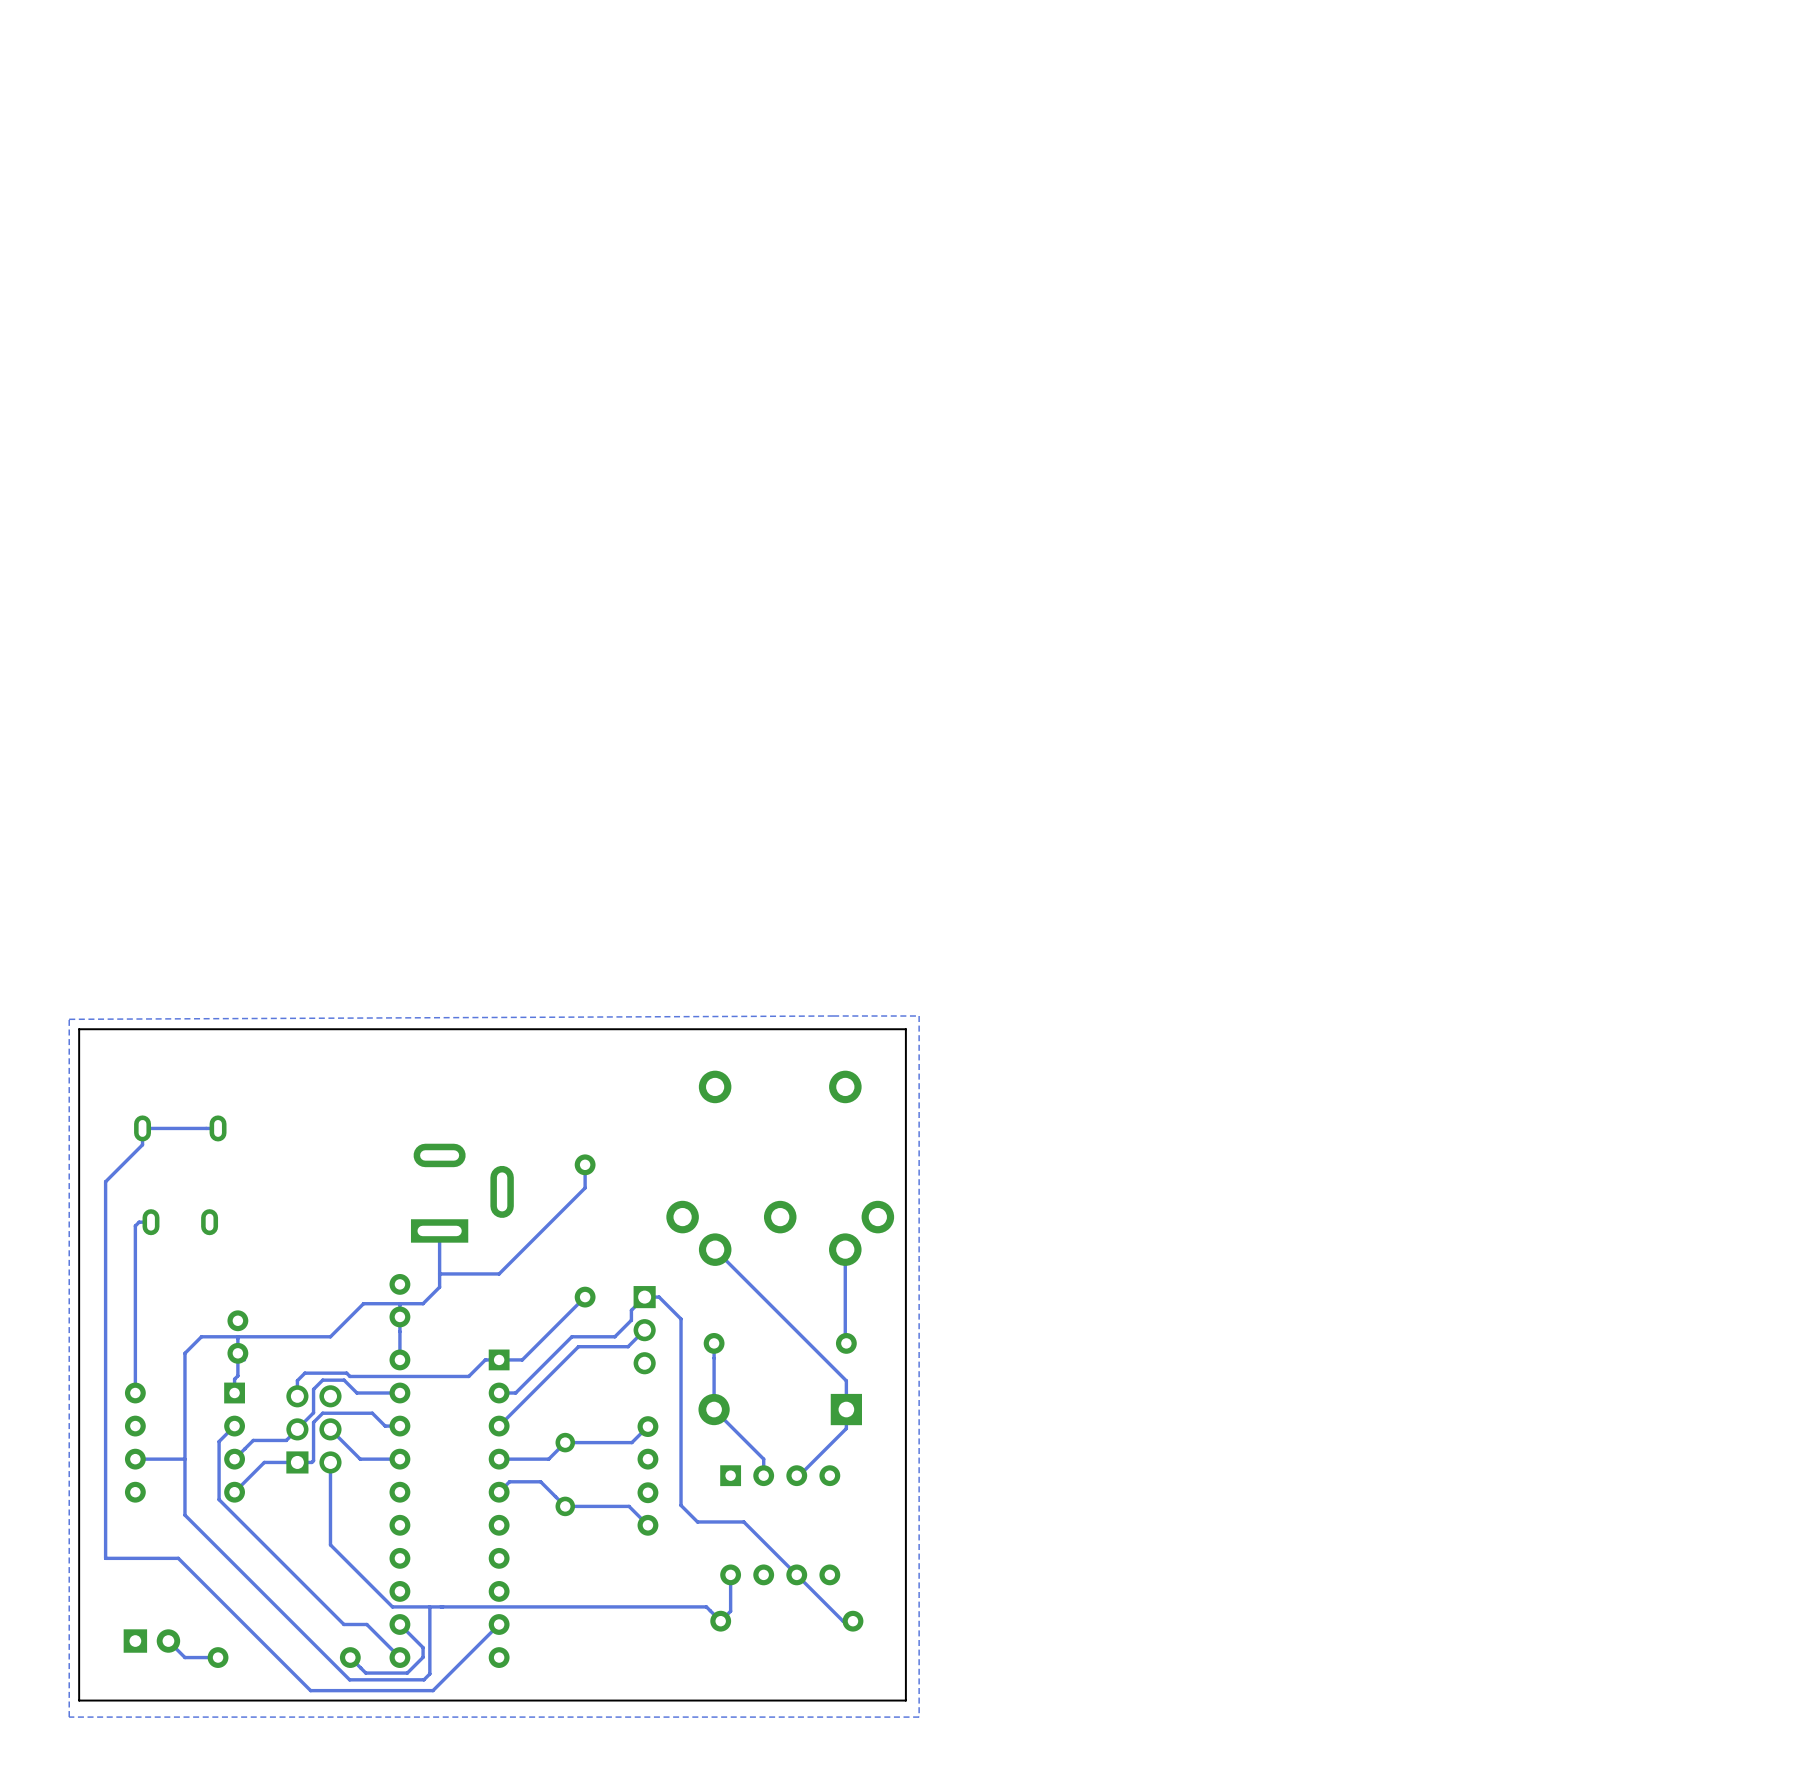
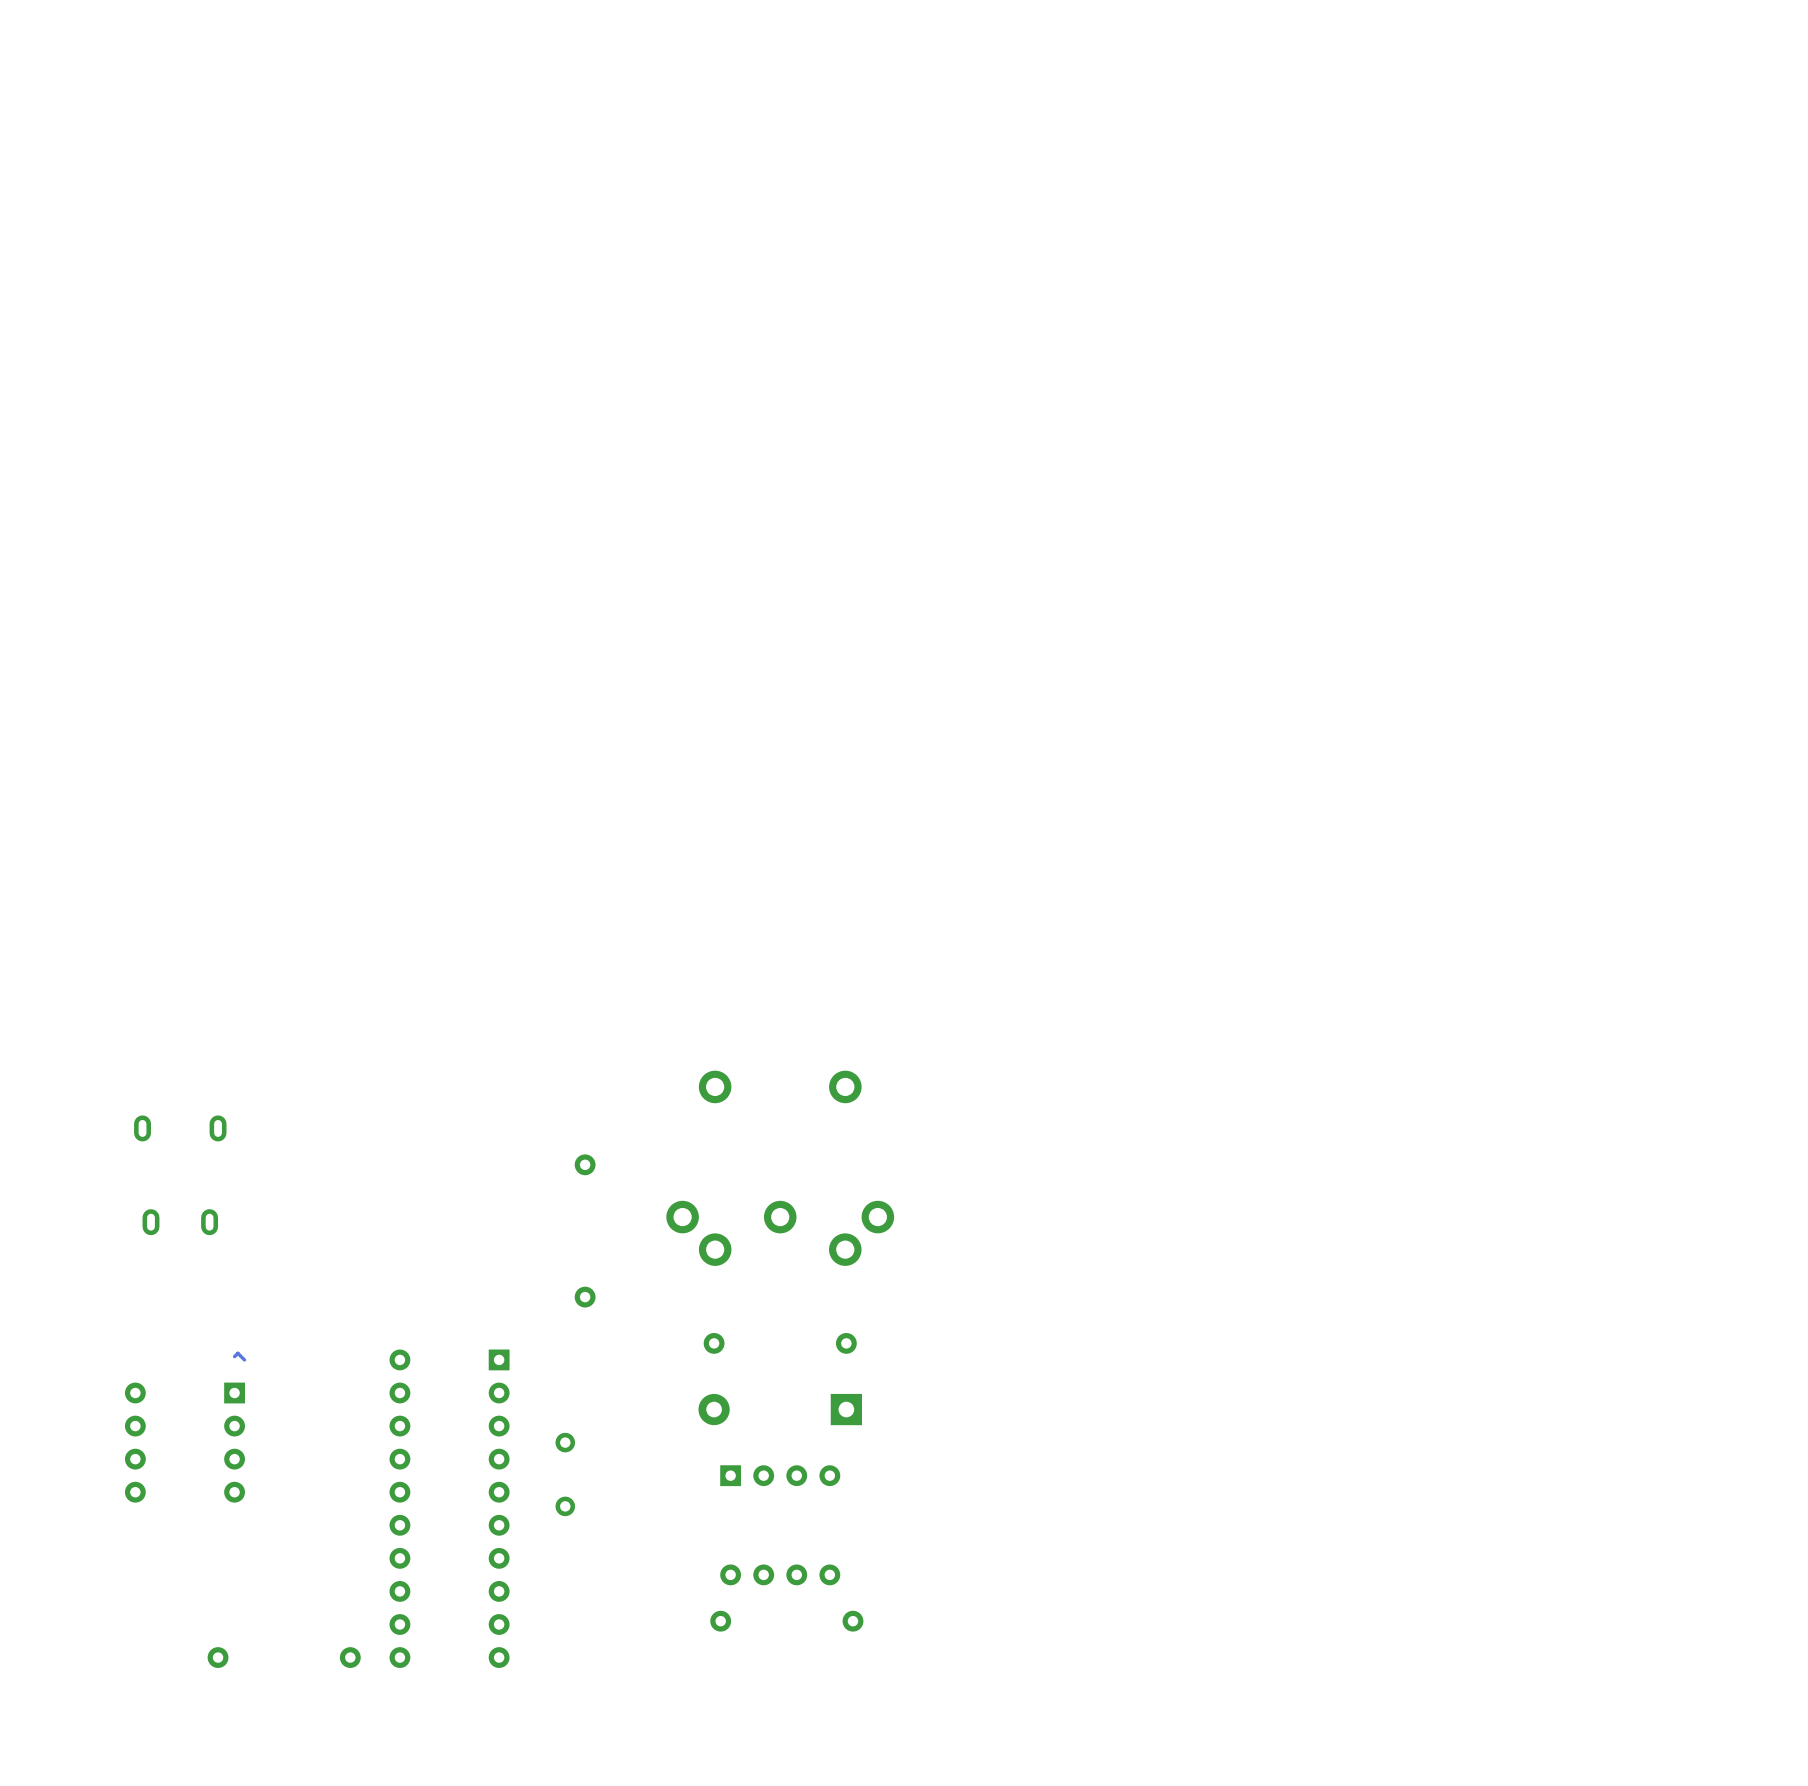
zone outline: (919, 1016) (919, 1717) (69, 1717) (69, 1019) (919, 1016) -> none
board edge: (905, 1029) (79, 1029) (79, 1700) (905, 1700) (905, 1029) -> none
track: (218, 1128) (142, 1128) (142, 1144) (105, 1181) (105, 1558) (178, 1558) (310, 1690) (433, 1690) (499, 1624) -> none
track: (585, 1164) (585, 1187) (499, 1273) (439, 1273) -> none
part: (462, 1193) -> none
track: (150, 1222) (139, 1222) (135, 1225) (135, 1393) -> none
track: (439, 1230) (439, 1287) (423, 1303) (363, 1303) (330, 1336) (201, 1336) (184, 1353) (184, 1515) (349, 1679) (423, 1679) (429, 1673) (429, 1607) -> none
track: (715, 1249) (846, 1380) (846, 1428) (799, 1475) (796, 1475) -> none
track: (845, 1249) (846, 1343) -> none
track: (585, 1297) (522, 1359) (485, 1359) (468, 1376) (349, 1376) (346, 1373) (304, 1373) (297, 1380) (297, 1396) -> none
part: (399, 1300) -> none
track: (399, 1303) (399, 1359) -> none
track: (644, 1330) (628, 1346) (578, 1346) (499, 1426) -> none
part: (644, 1330) -> none
track: (237, 1336) (237, 1375) (234, 1379) (234, 1393) -> none
part: (237, 1337) -> none
track: (714, 1343) (714, 1409) (763, 1459) (763, 1475) -> none
track: (399, 1393) (356, 1393) (344, 1380) (322, 1380) (313, 1389) (313, 1412) (286, 1440) (253, 1440) (234, 1459) -> none
track: (499, 1393) (515, 1393) (571, 1336) (614, 1336) (631, 1320) (631, 1310) (644, 1297) (659, 1297) (681, 1319) (681, 1505) (697, 1521) (743, 1521) (843, 1621) (852, 1621) -> none
track: (234, 1426) (219, 1441) (219, 1499) (343, 1624) (366, 1624) (399, 1657) -> none
track: (399, 1426) (385, 1426) (372, 1413) (322, 1413) (313, 1422) (313, 1460) (311, 1462) (264, 1462) (234, 1492) -> none
track: (647, 1426) (631, 1442) (565, 1442) (548, 1459) (499, 1459) -> none
part: (313, 1429) -> none
track: (330, 1429) (360, 1459) (399, 1459) -> none
part: (647, 1442) -> none
track: (135, 1455) (135, 1459) (184, 1459) -> none
track: (330, 1462) (330, 1544) (392, 1606) (706, 1606) (720, 1621) (730, 1611) (730, 1574) -> none
track: (499, 1492) (509, 1481) (540, 1481) (565, 1506) (629, 1506) (647, 1525) -> none
part: (647, 1509) -> none
track: (399, 1624) (423, 1647) (423, 1657) (407, 1673) (365, 1673) (350, 1657) -> none
part: (151, 1641) -> none
track: (168, 1641) (184, 1657) (218, 1657) -> none

